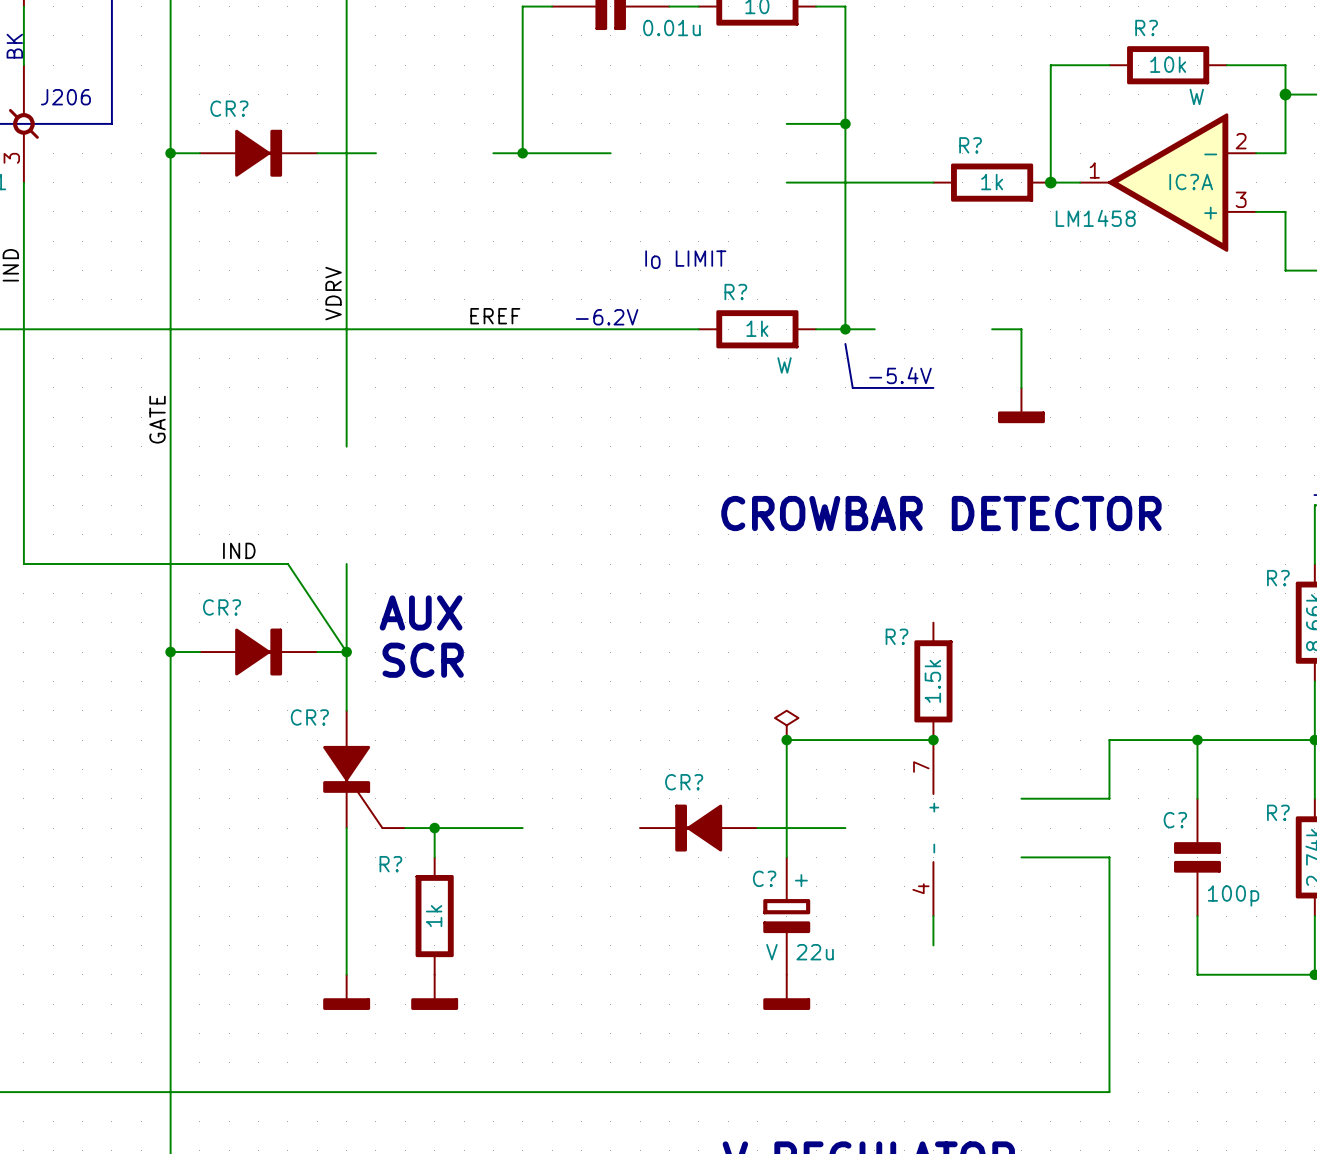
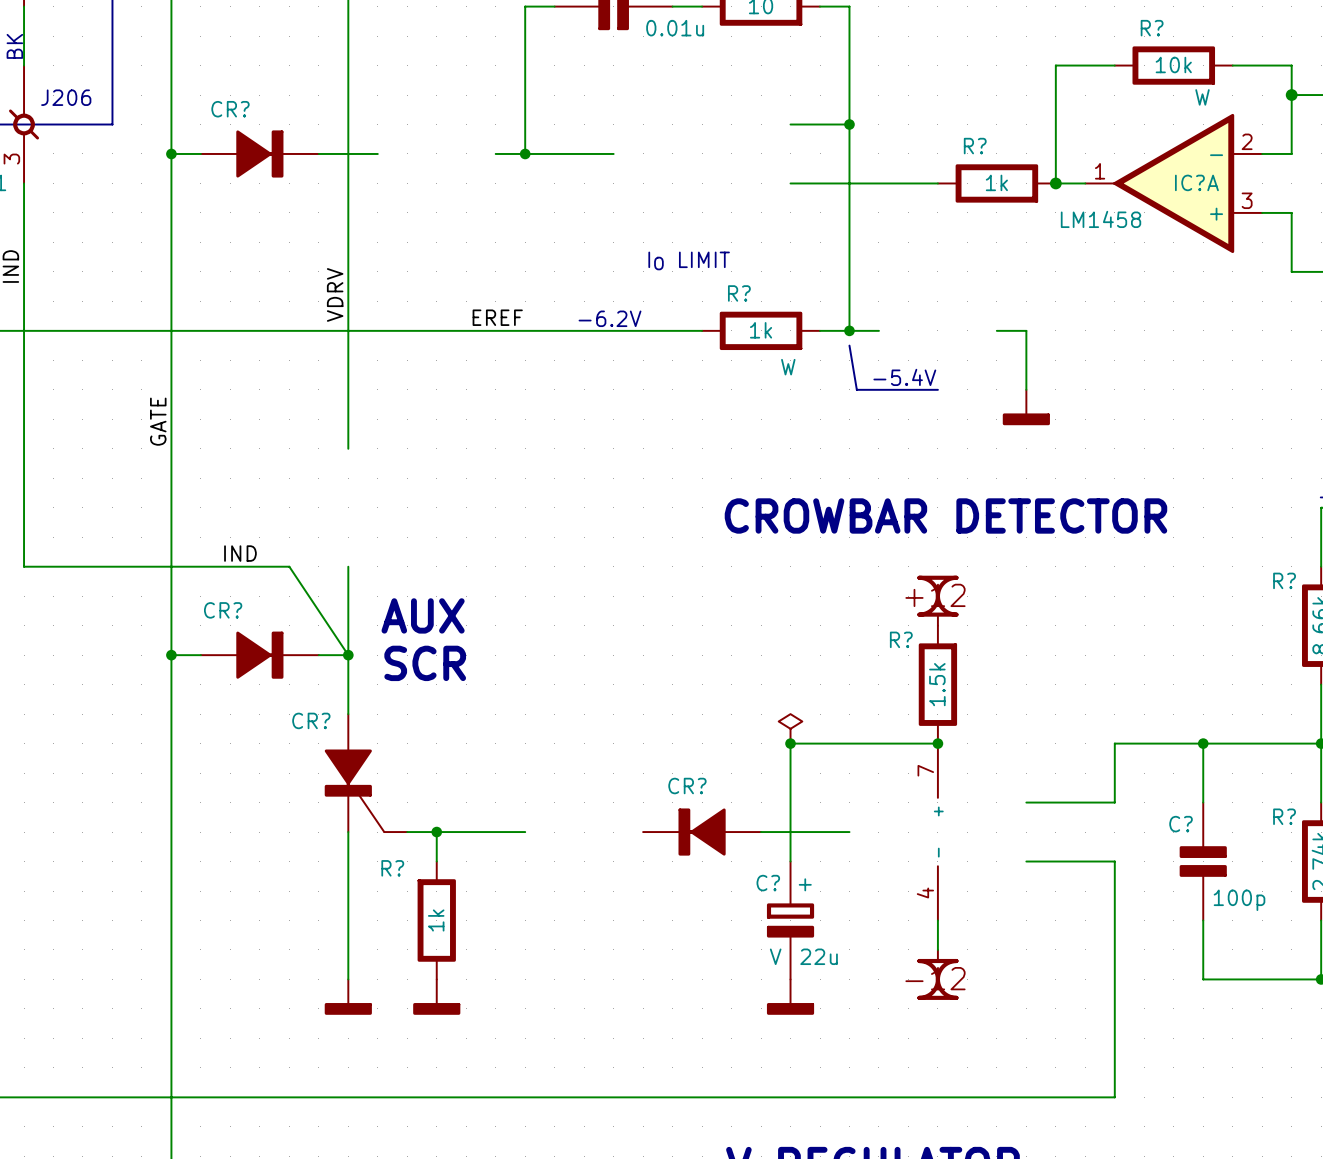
power symbol: none -> (937, 600)
power symbol: none -> (937, 974)

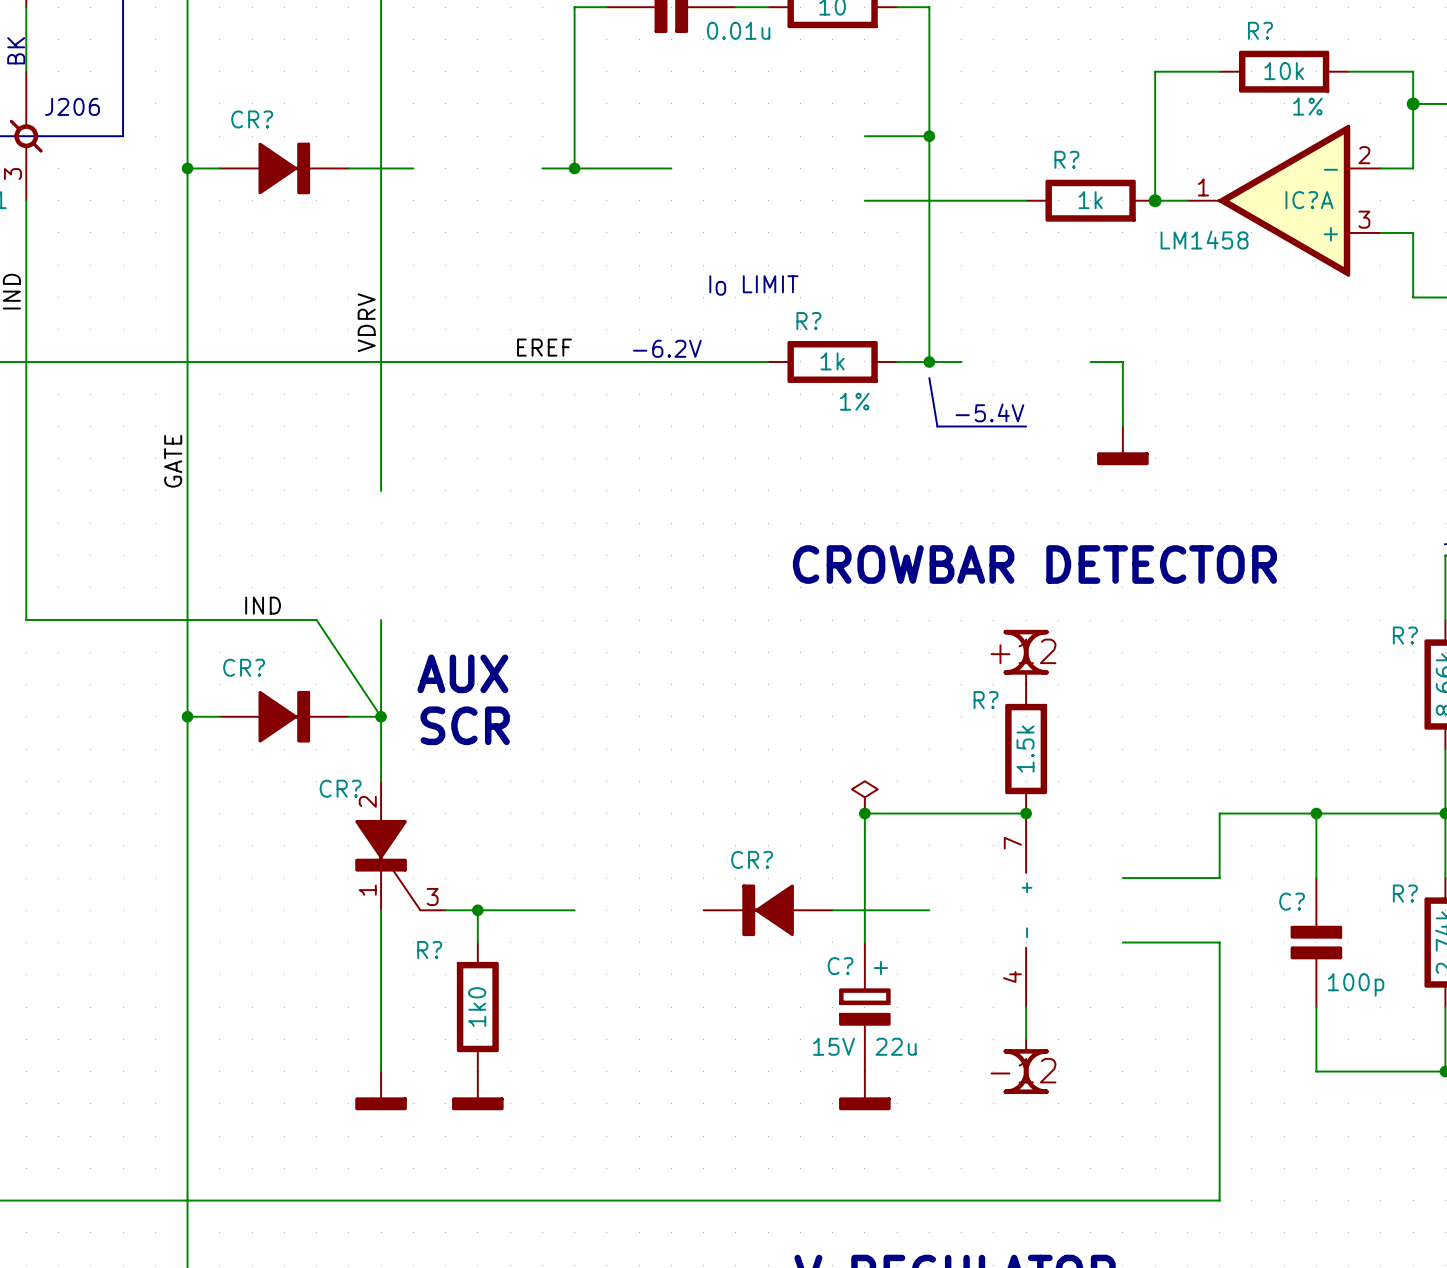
R? text: W (1202, 97) -> 1% (1307, 106)
R? text: W (788, 367) -> 1% (854, 401)
CR? pin number: none -> 2 (367, 801)
CR? pin number: none -> 1 (367, 890)
CR? pin number: none -> 3 (432, 896)
R? value: 1k (436, 920) -> 1k0 (477, 1007)
C? text: V (775, 956) -> 15V (834, 1046)

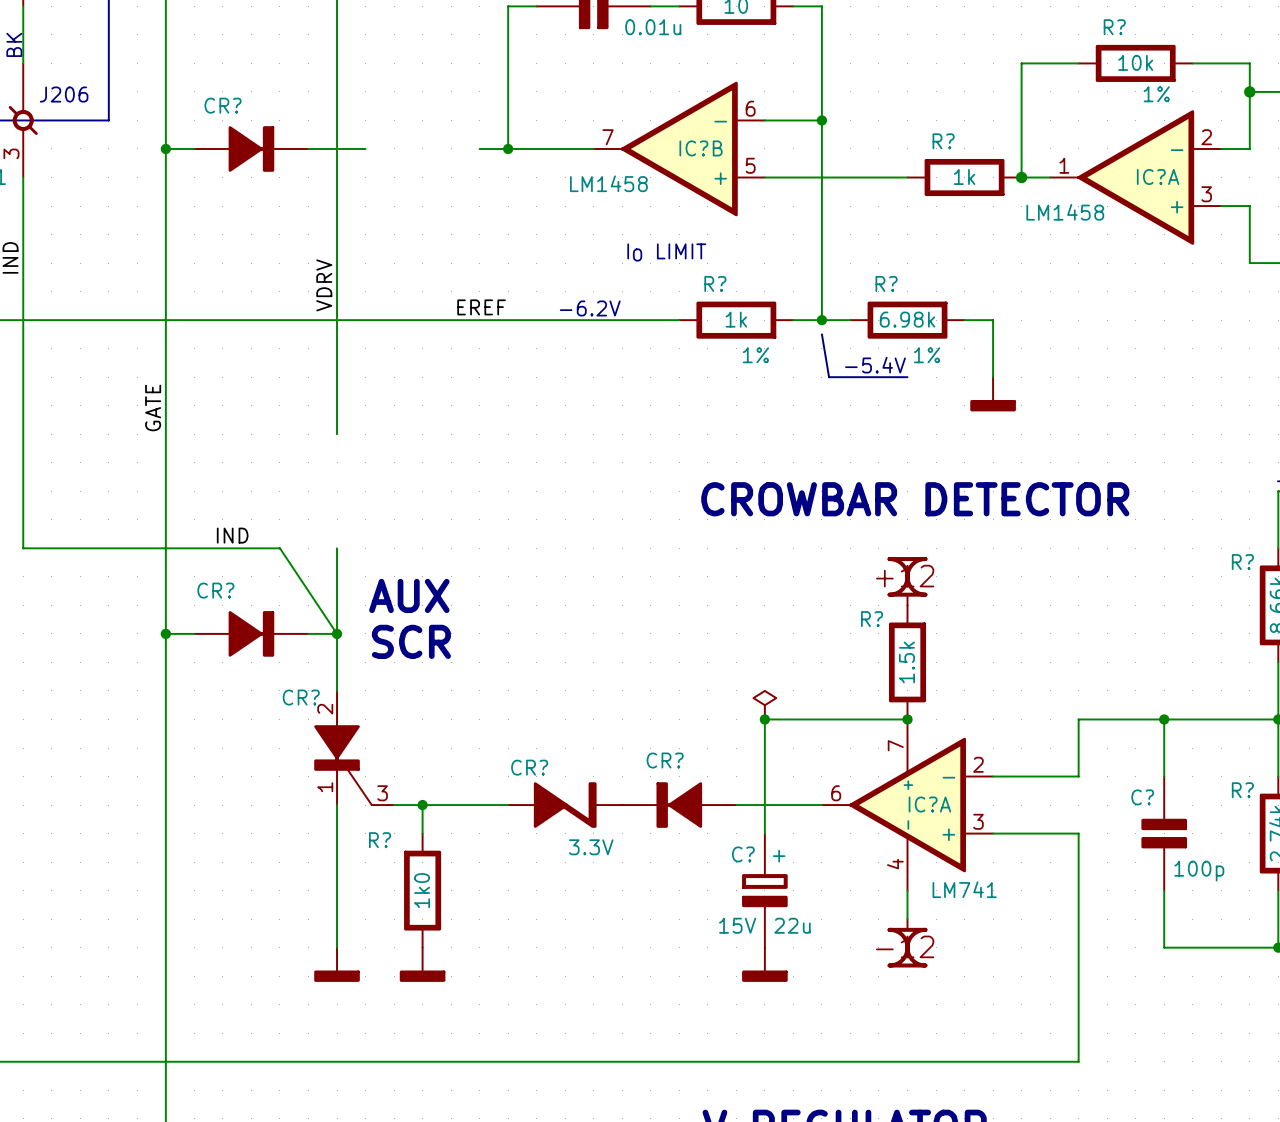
IC?B: none -> LM1458 (679, 148)
R?: none -> 6.98k (907, 320)
CR?: none -> 3.3V (565, 805)
IC?A: none -> LM741 (907, 805)

